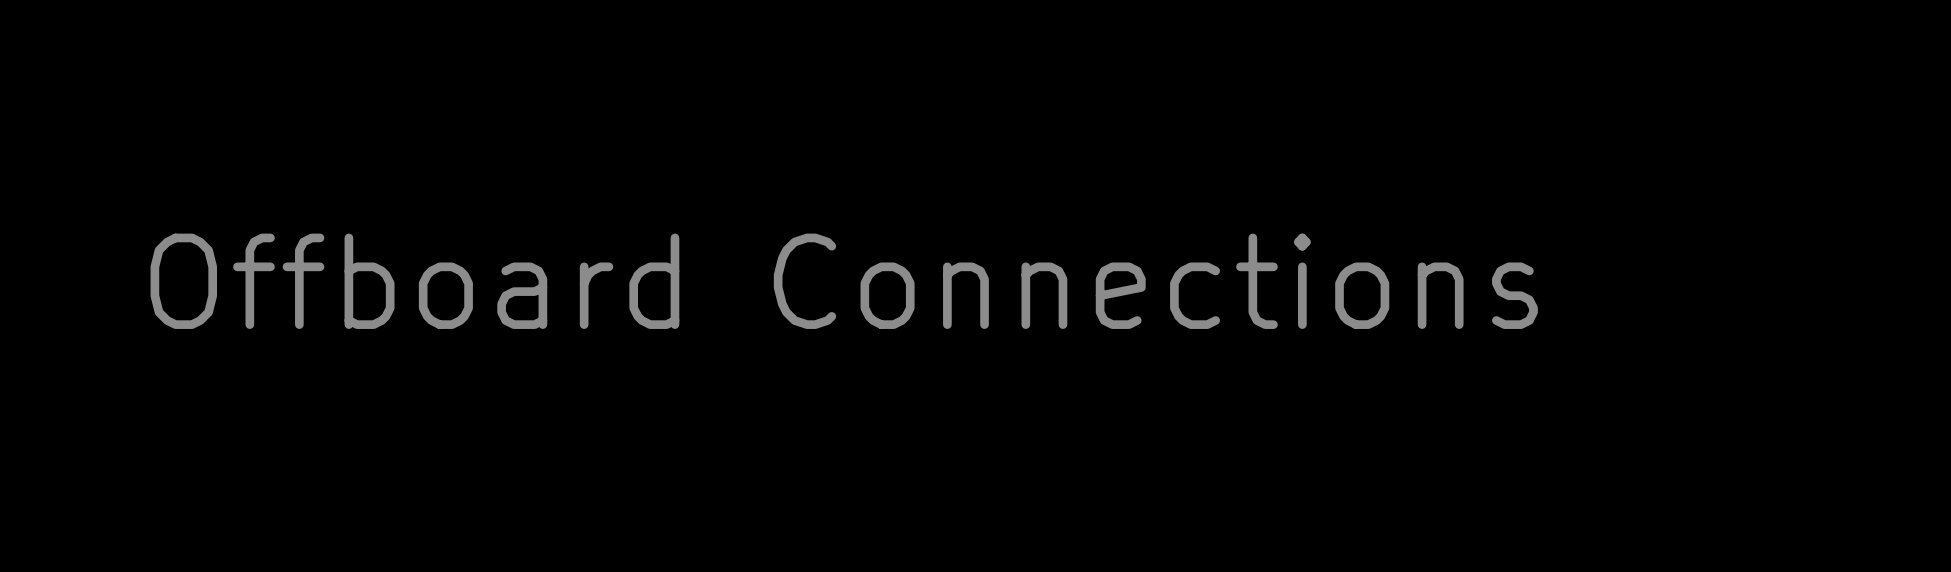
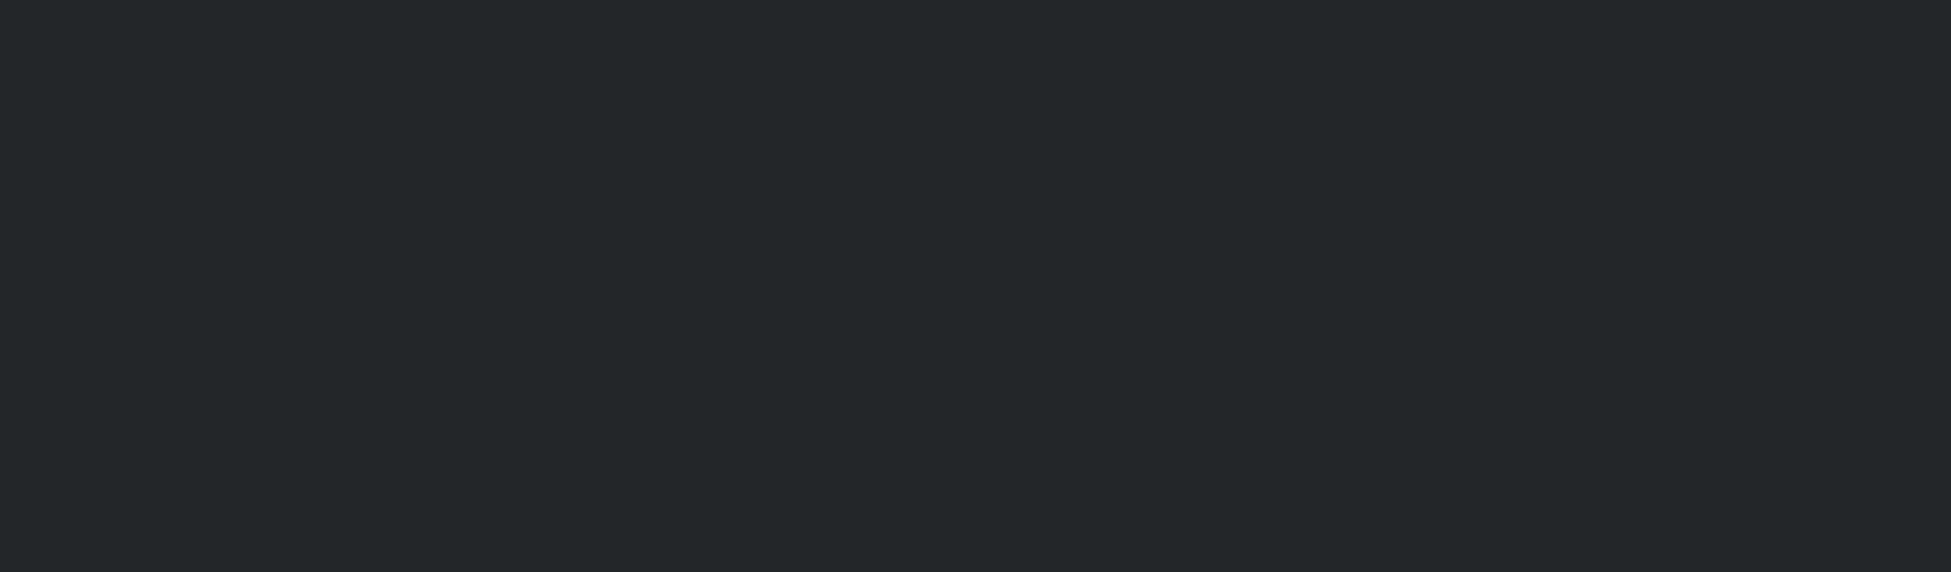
text: Offboard Connections (844, 281) -> none

